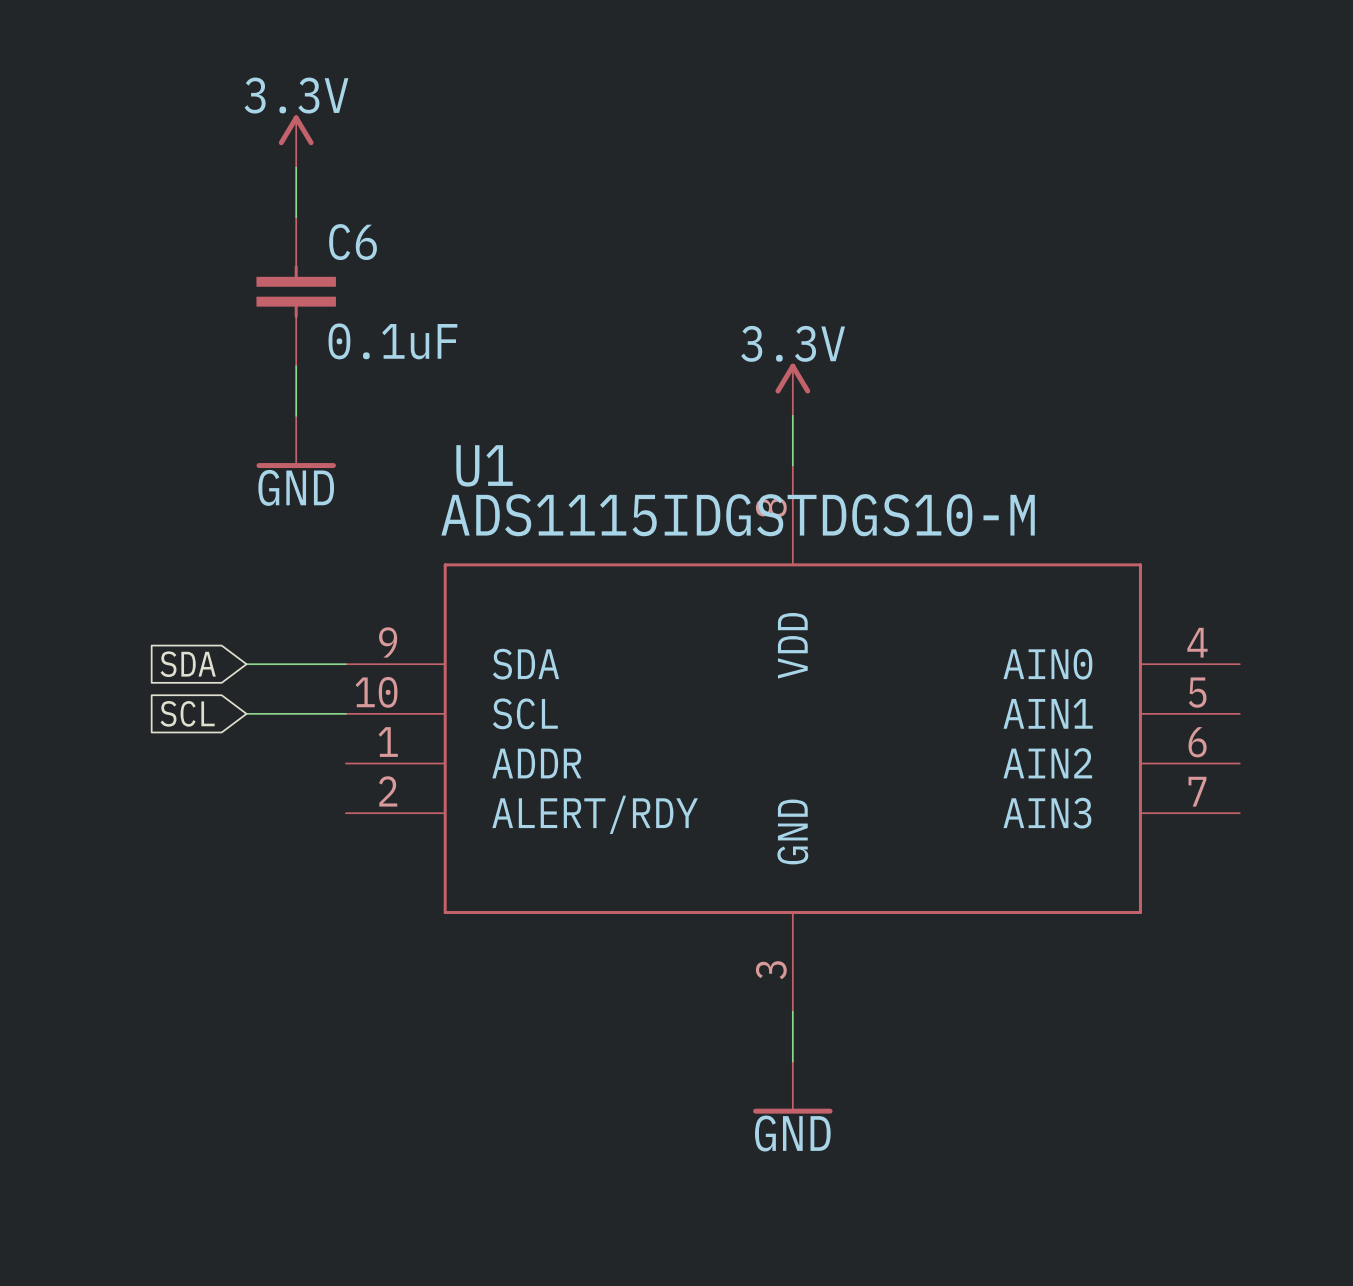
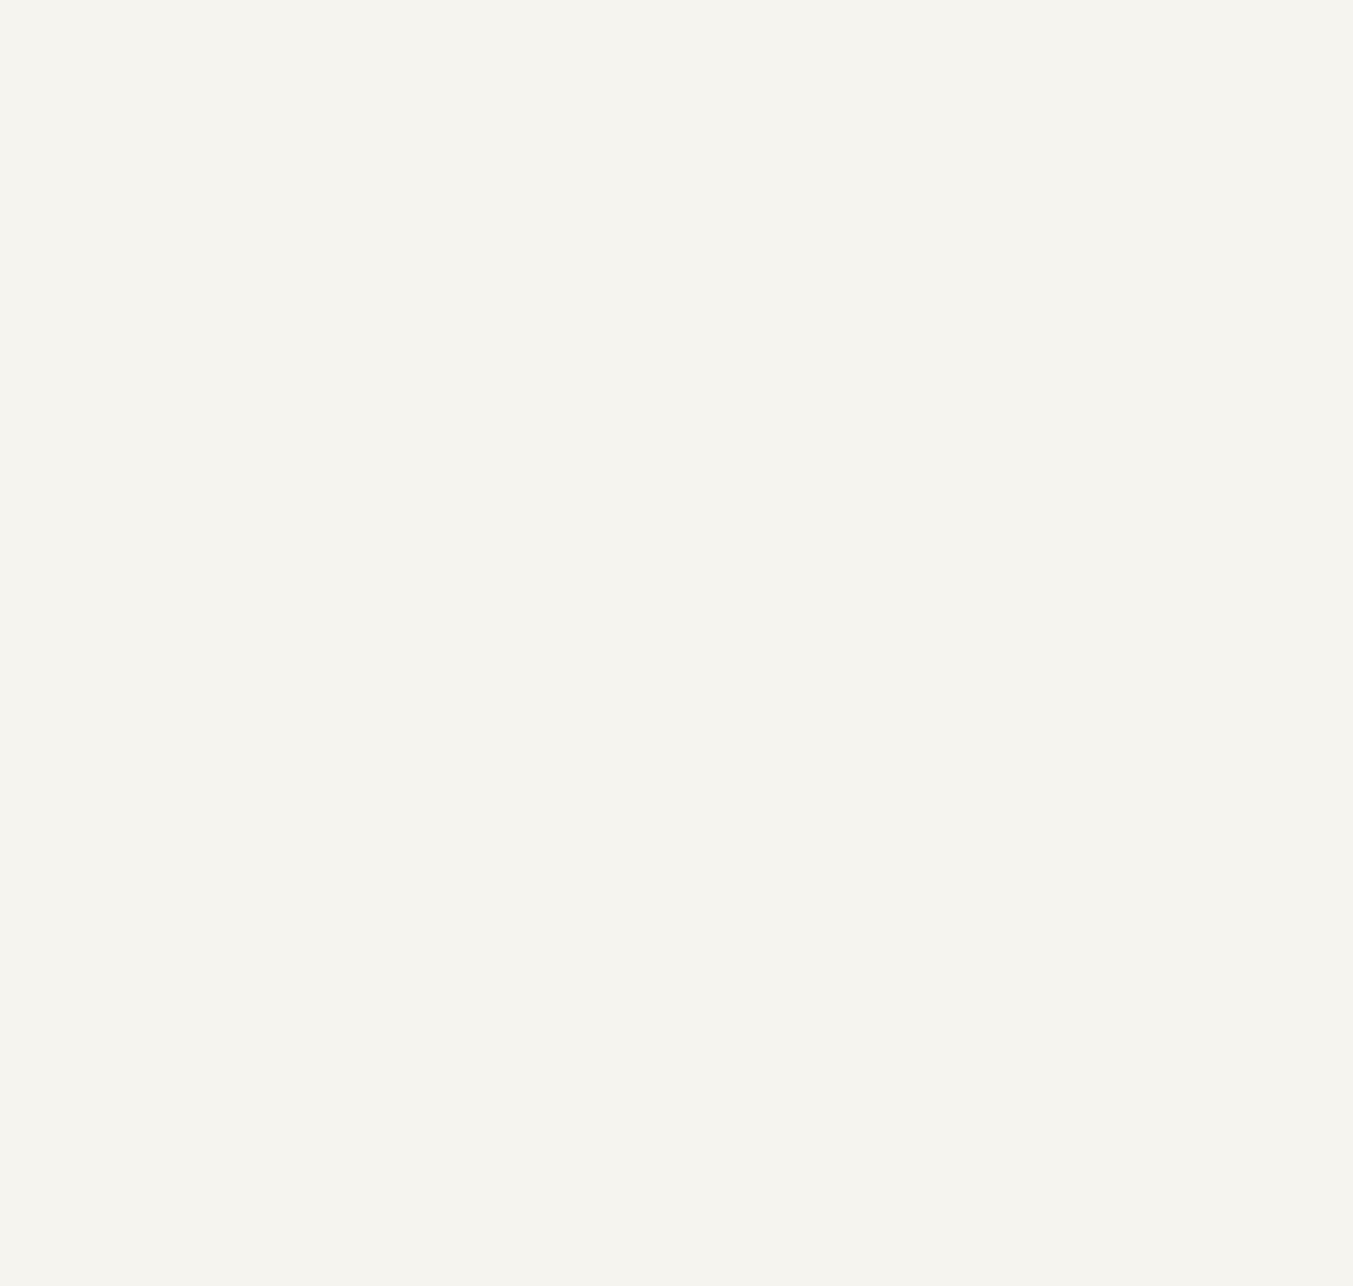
power symbol: 3.3V (296, 141) -> none
wire: (296, 167) (296, 217) -> none
C6: 0.1uF (296, 291) -> none
wire: (296, 366) (296, 415) -> none
power symbol: 3.3V (792, 389) -> none
wire: (792, 415) (792, 465) -> none
power symbol: GND (296, 441) -> none
global label: SDA (188, 664) -> none
wire: (246, 664) (345, 664) -> none
global label: SCL (187, 713) -> none
wire: (246, 713) (345, 713) -> none
U1: ADS1115IDGSTDGS10-M (792, 738) -> none
wire: (792, 1011) (792, 1061) -> none
power symbol: GND (792, 1087) -> none

